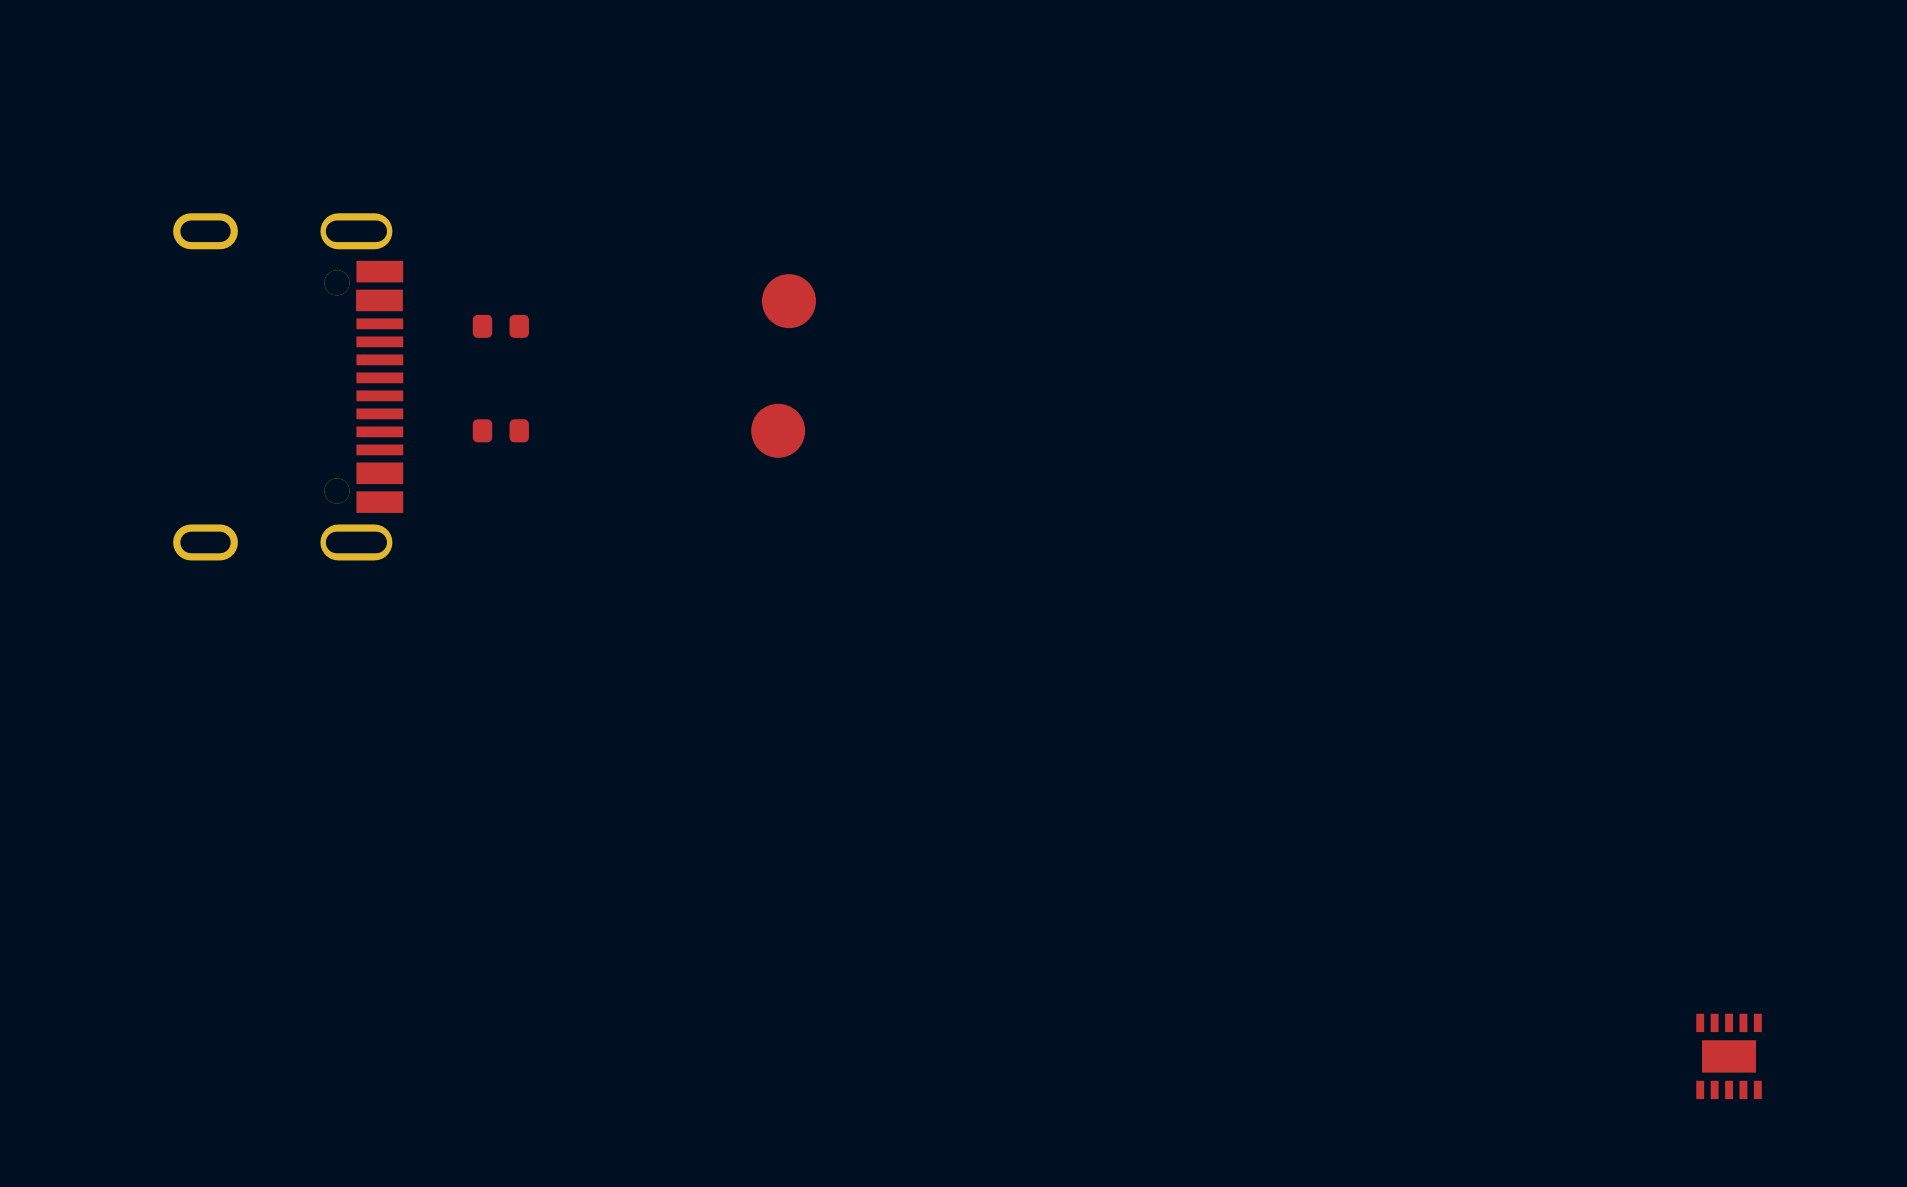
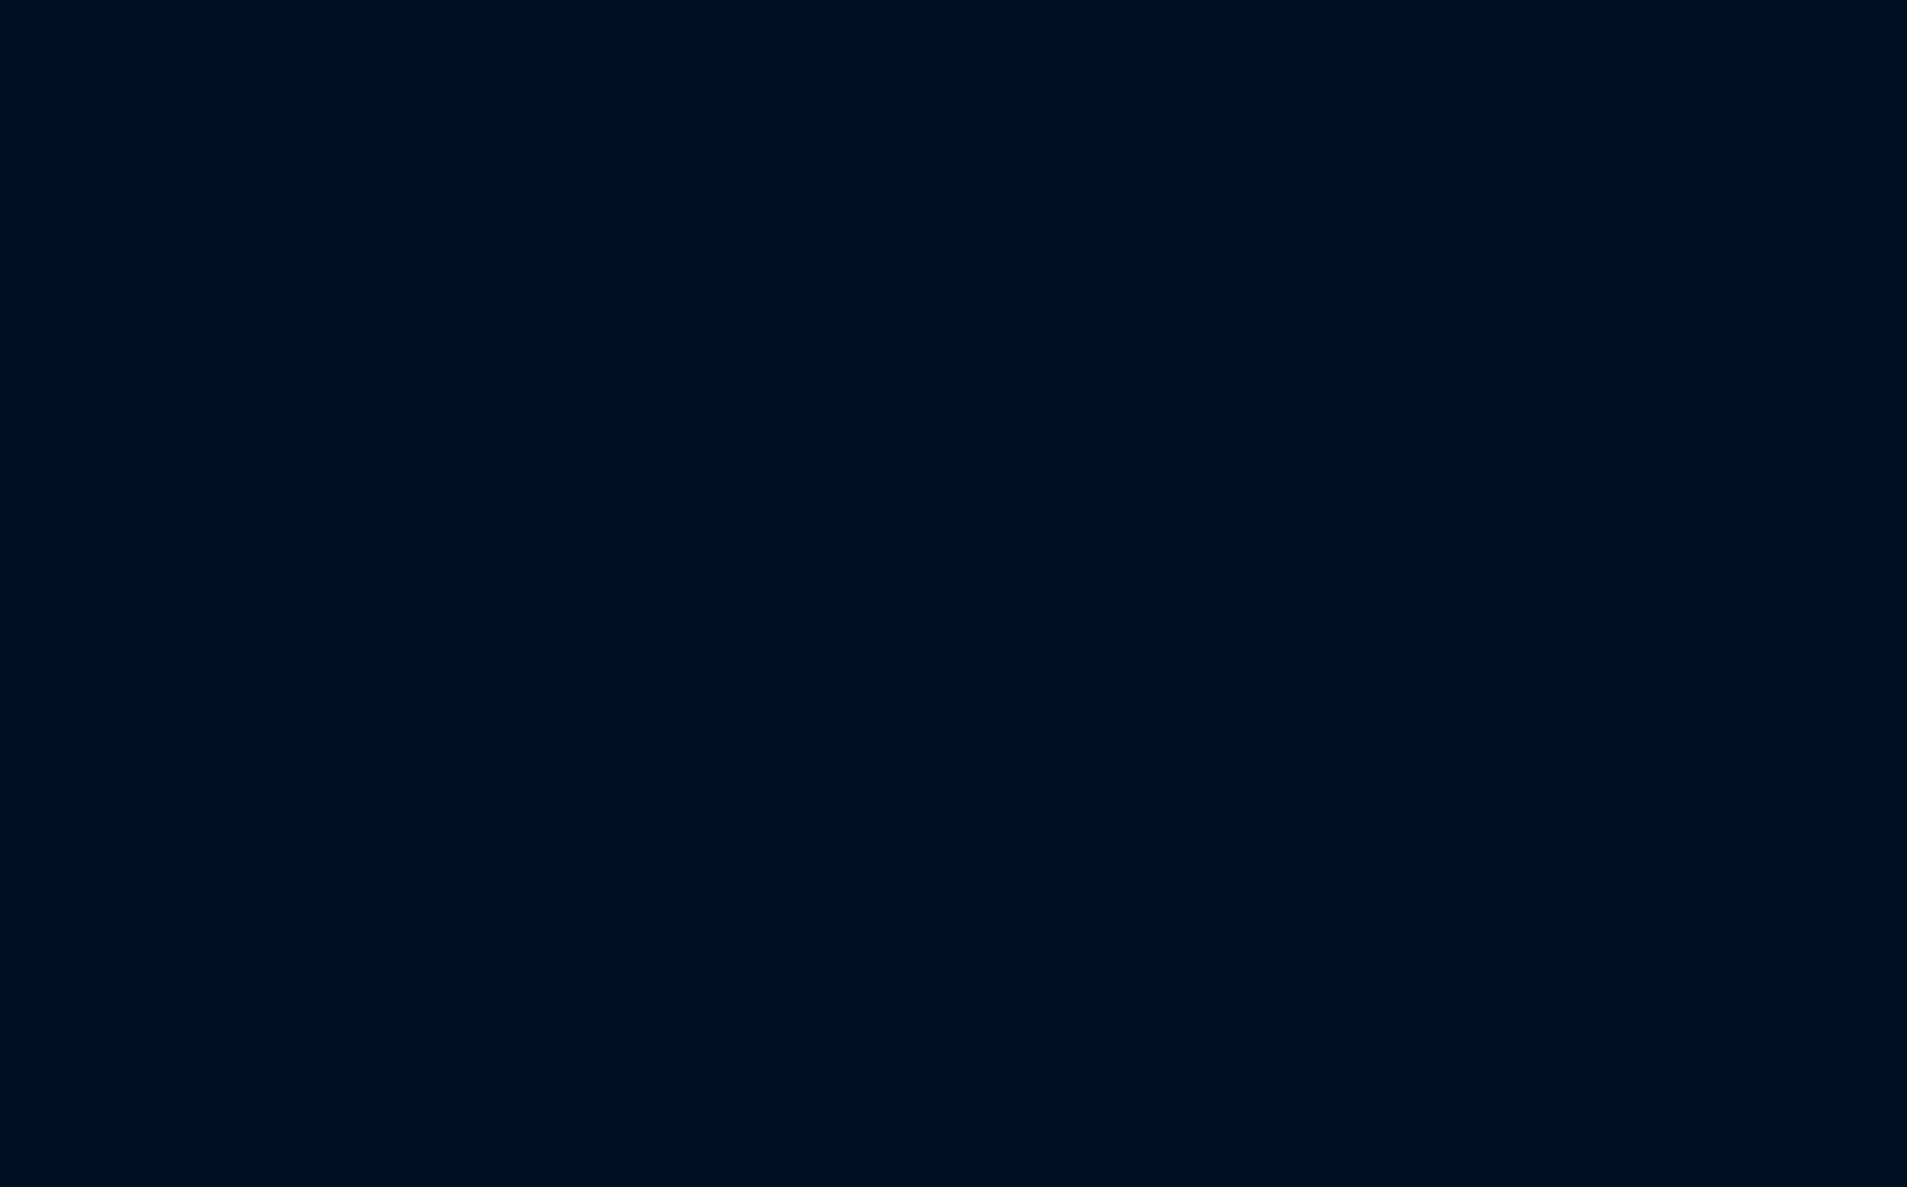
part: (788, 301) -> none
part: (500, 326) -> none
part: (288, 386) -> none
part: (500, 430) -> none
part: (778, 430) -> none
part: (1729, 1056) -> none

